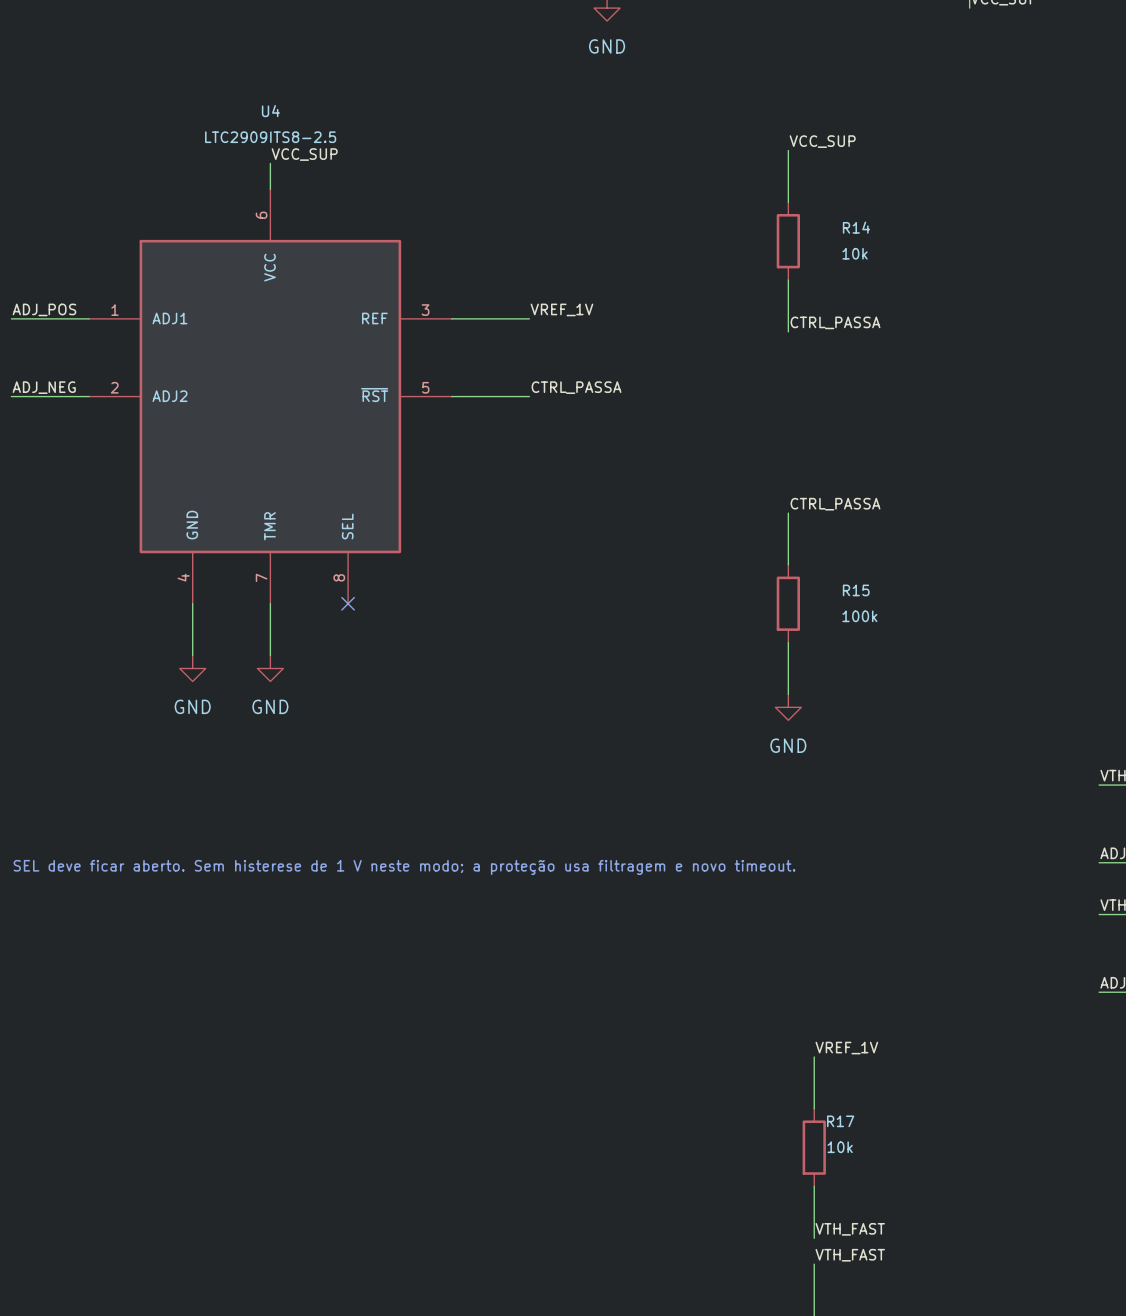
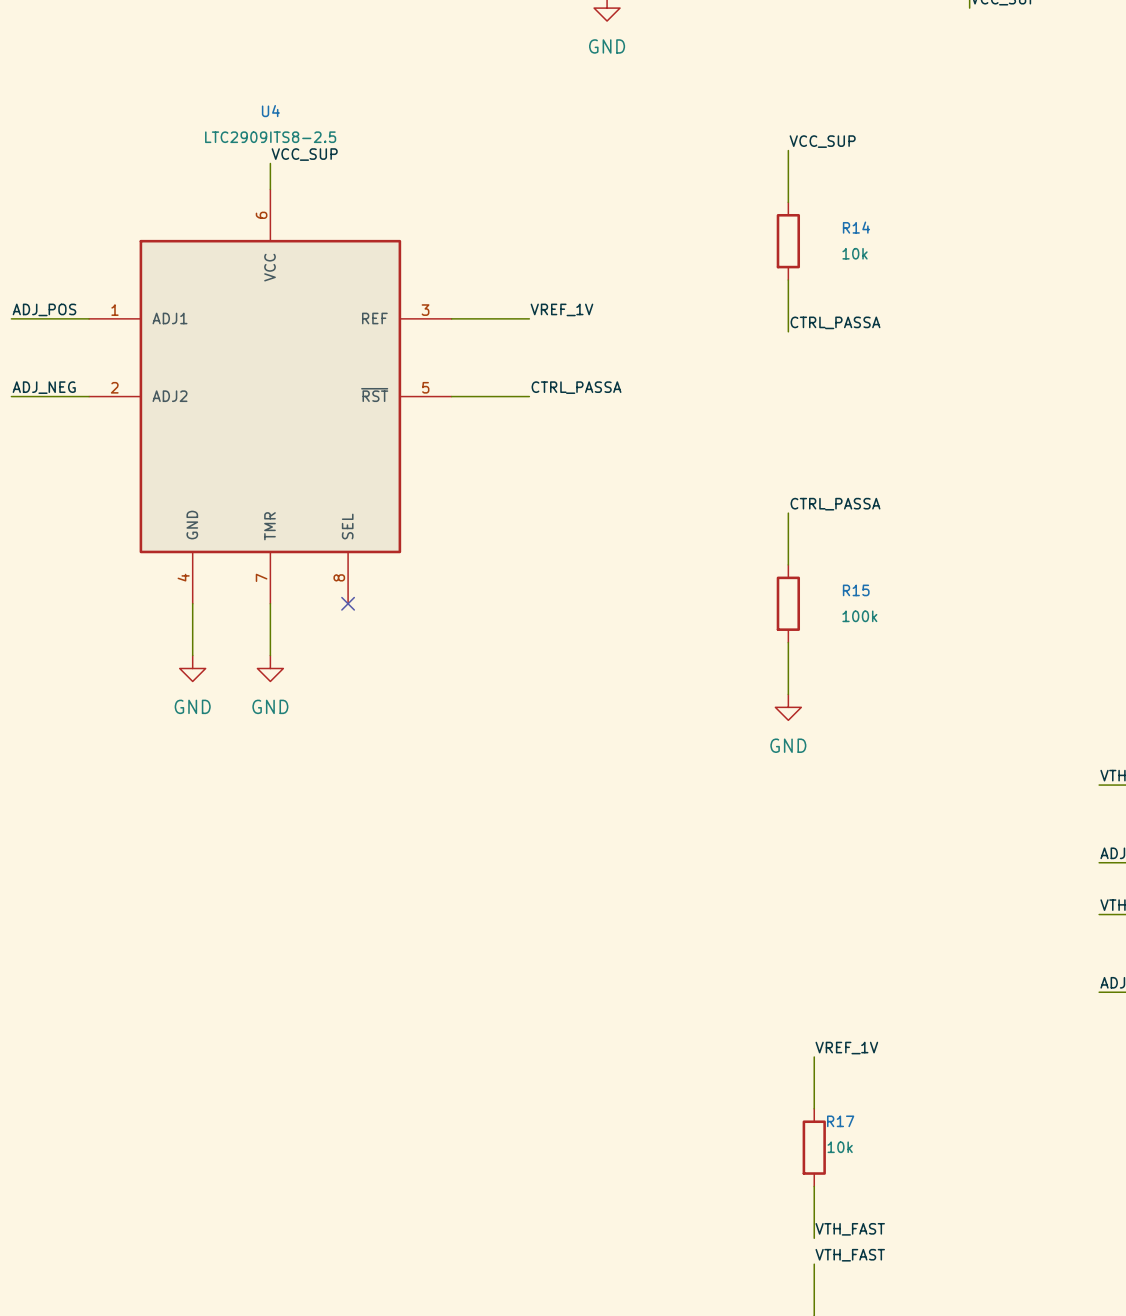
text: SEL deve ficar aberto. Sem histerese de 1 V neste modo; a proteção usa filtragem e novo timeout. (404, 867) -> none

